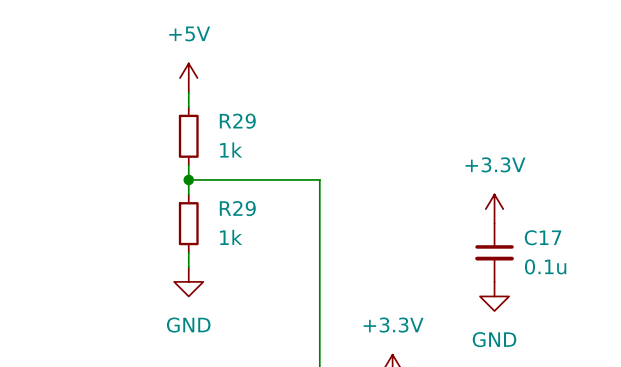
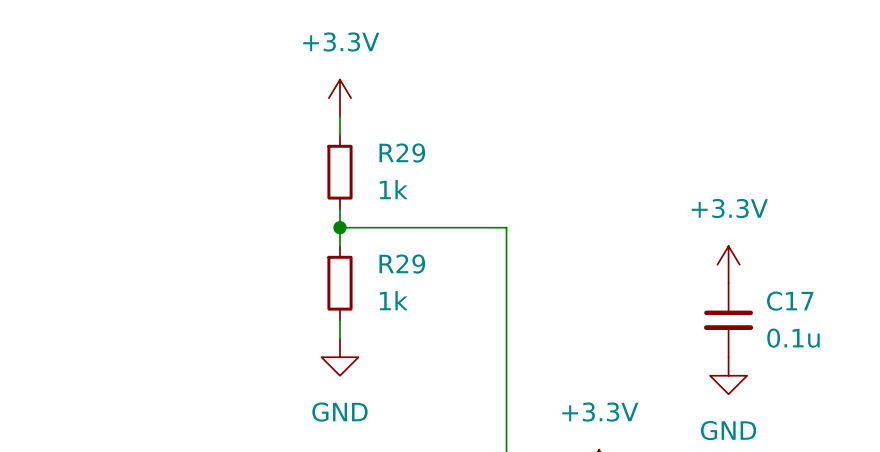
power symbol: +5V (188, 78) -> +3.3V (339, 98)

